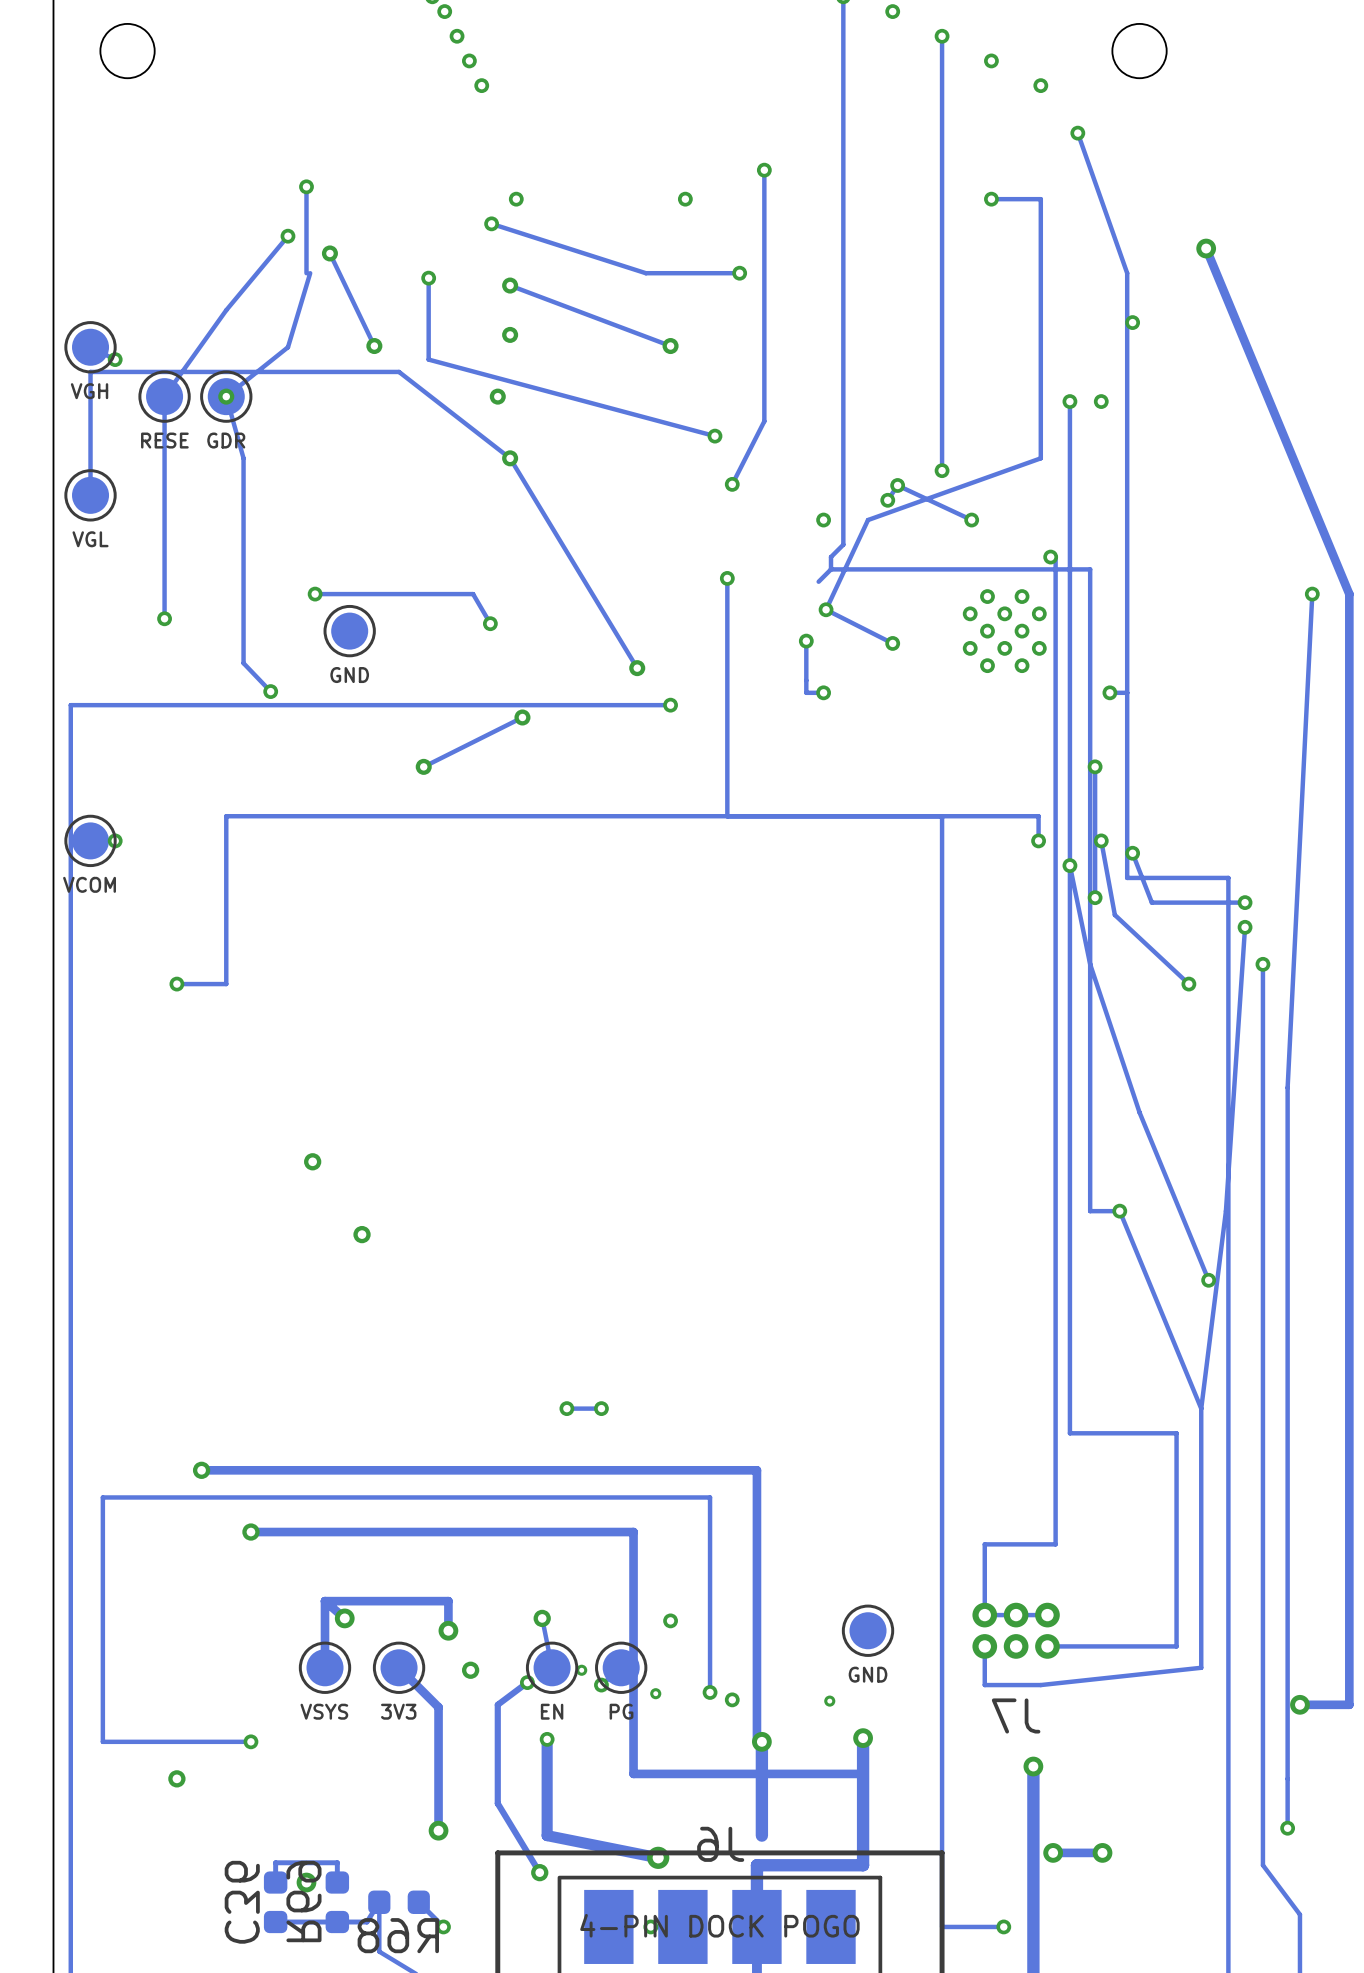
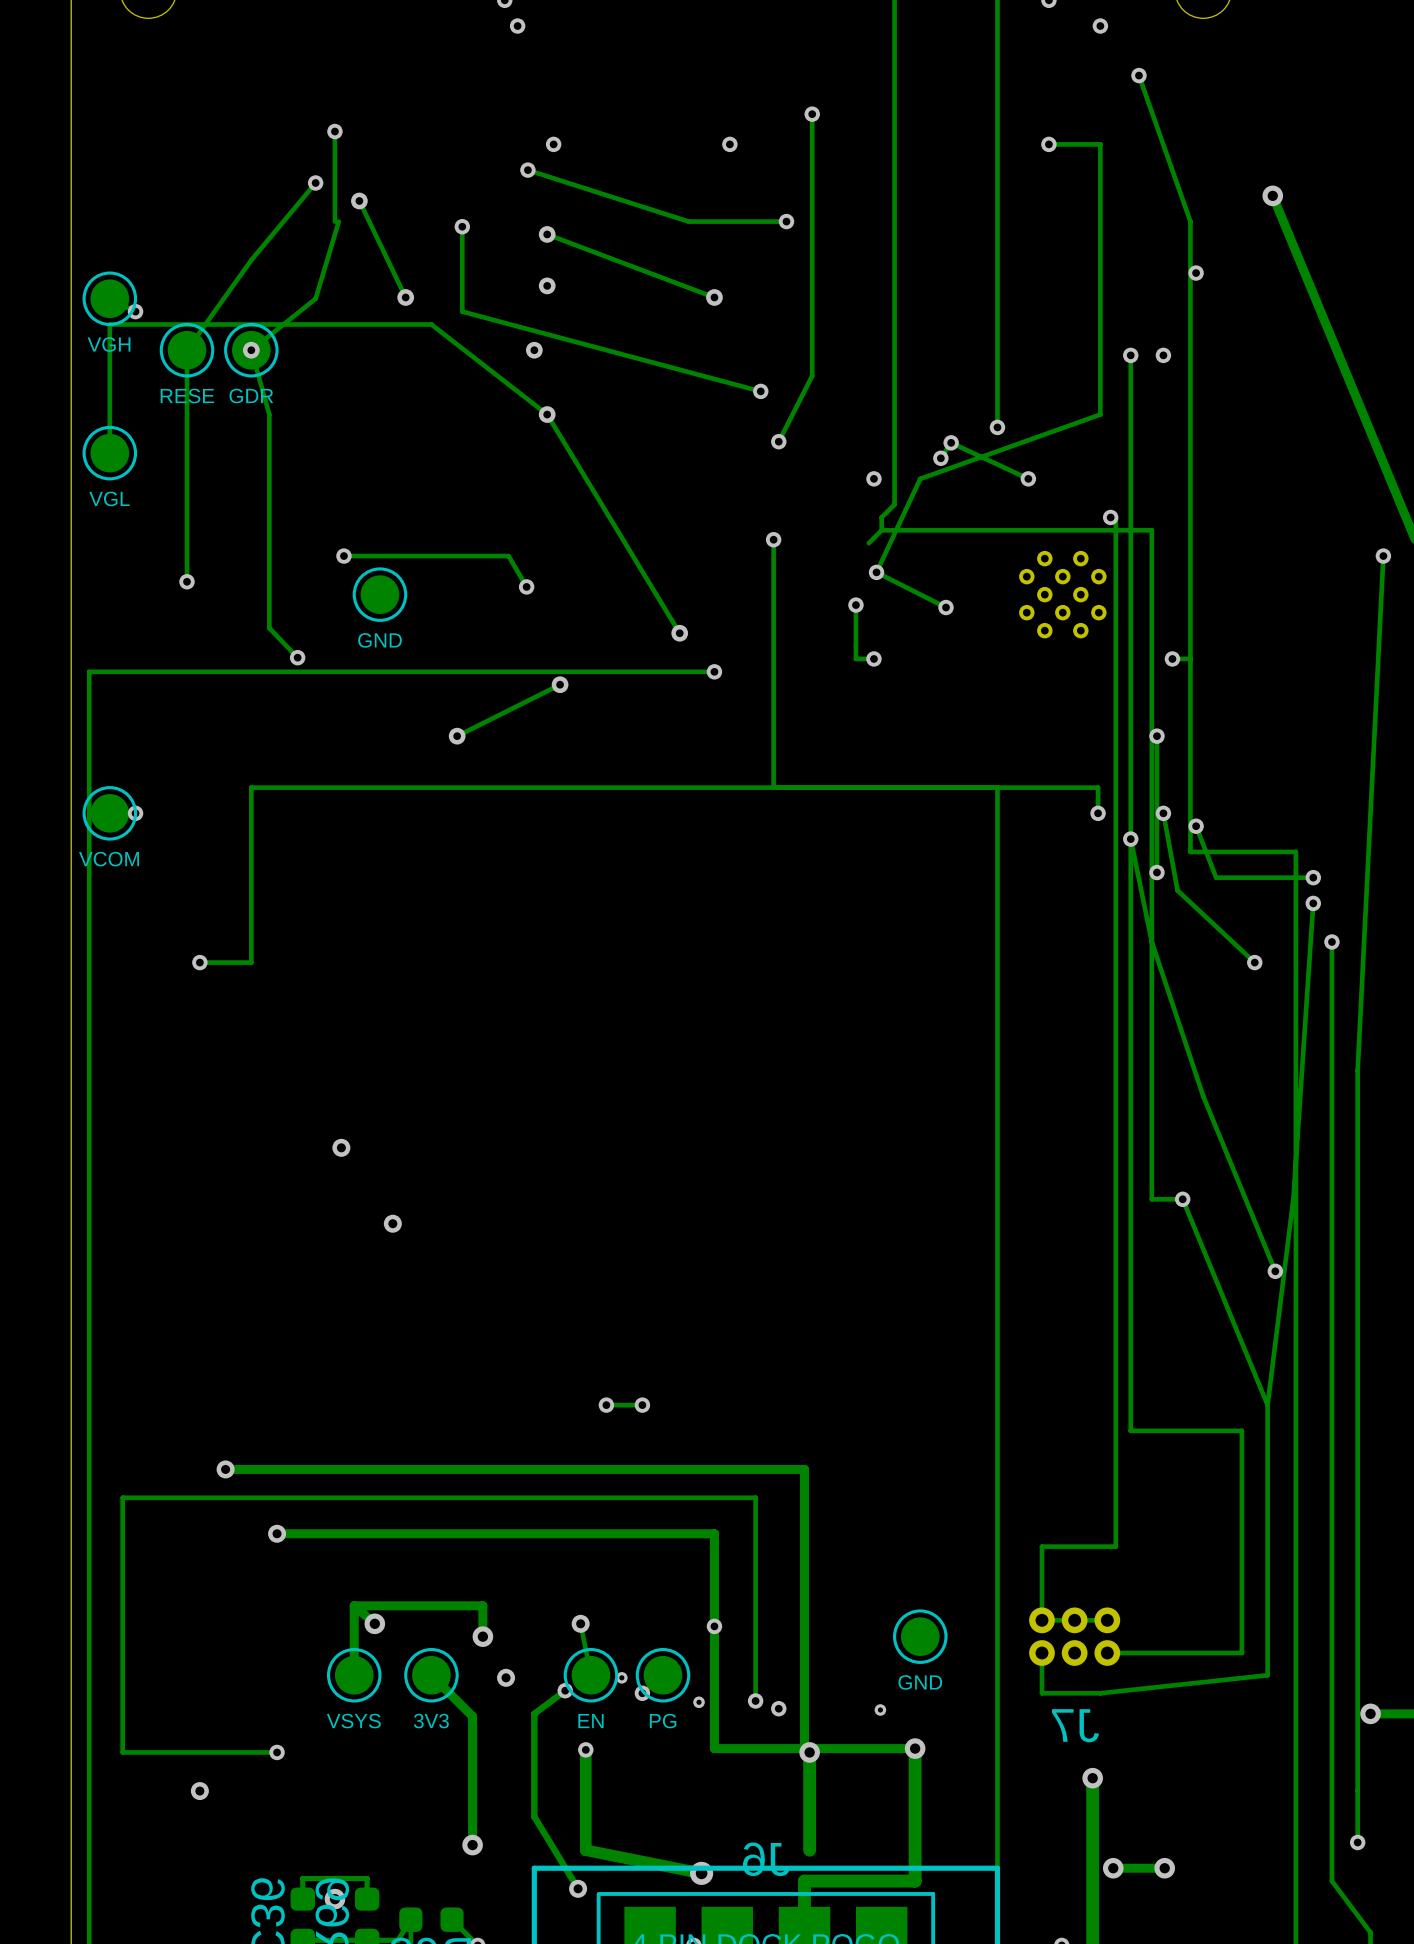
track: (633, 1532) (633, 1773) (863, 1773) (863, 1738) -> (675, 1533) (714, 1533) (714, 1748) (915, 1748)

